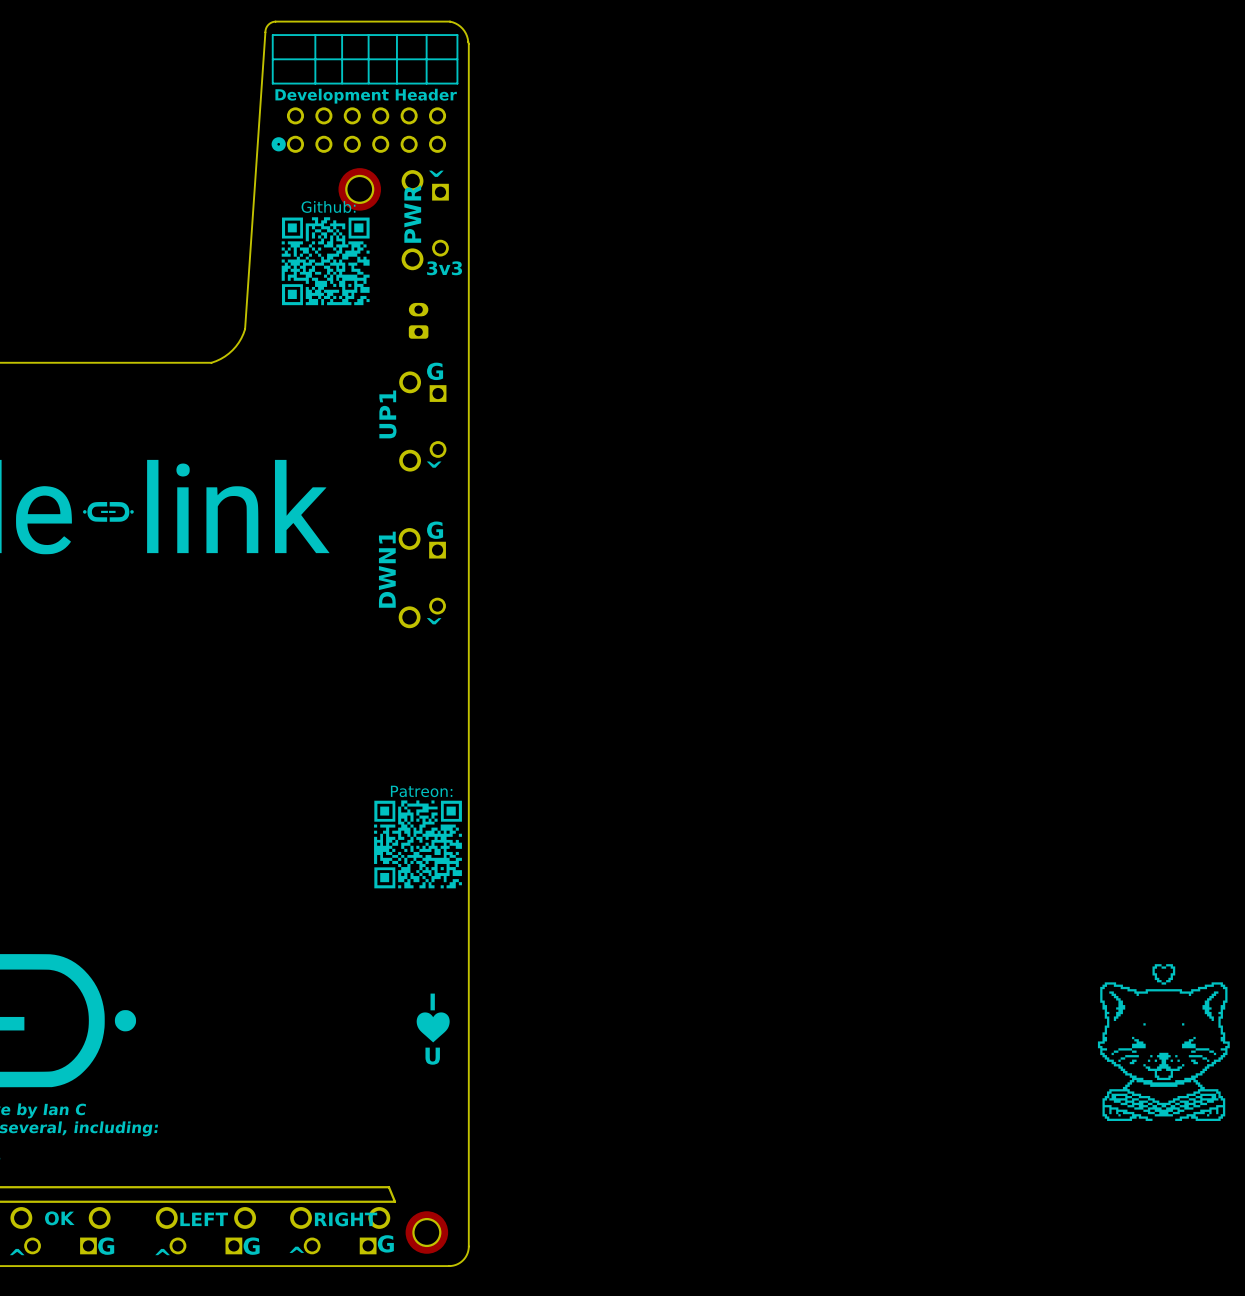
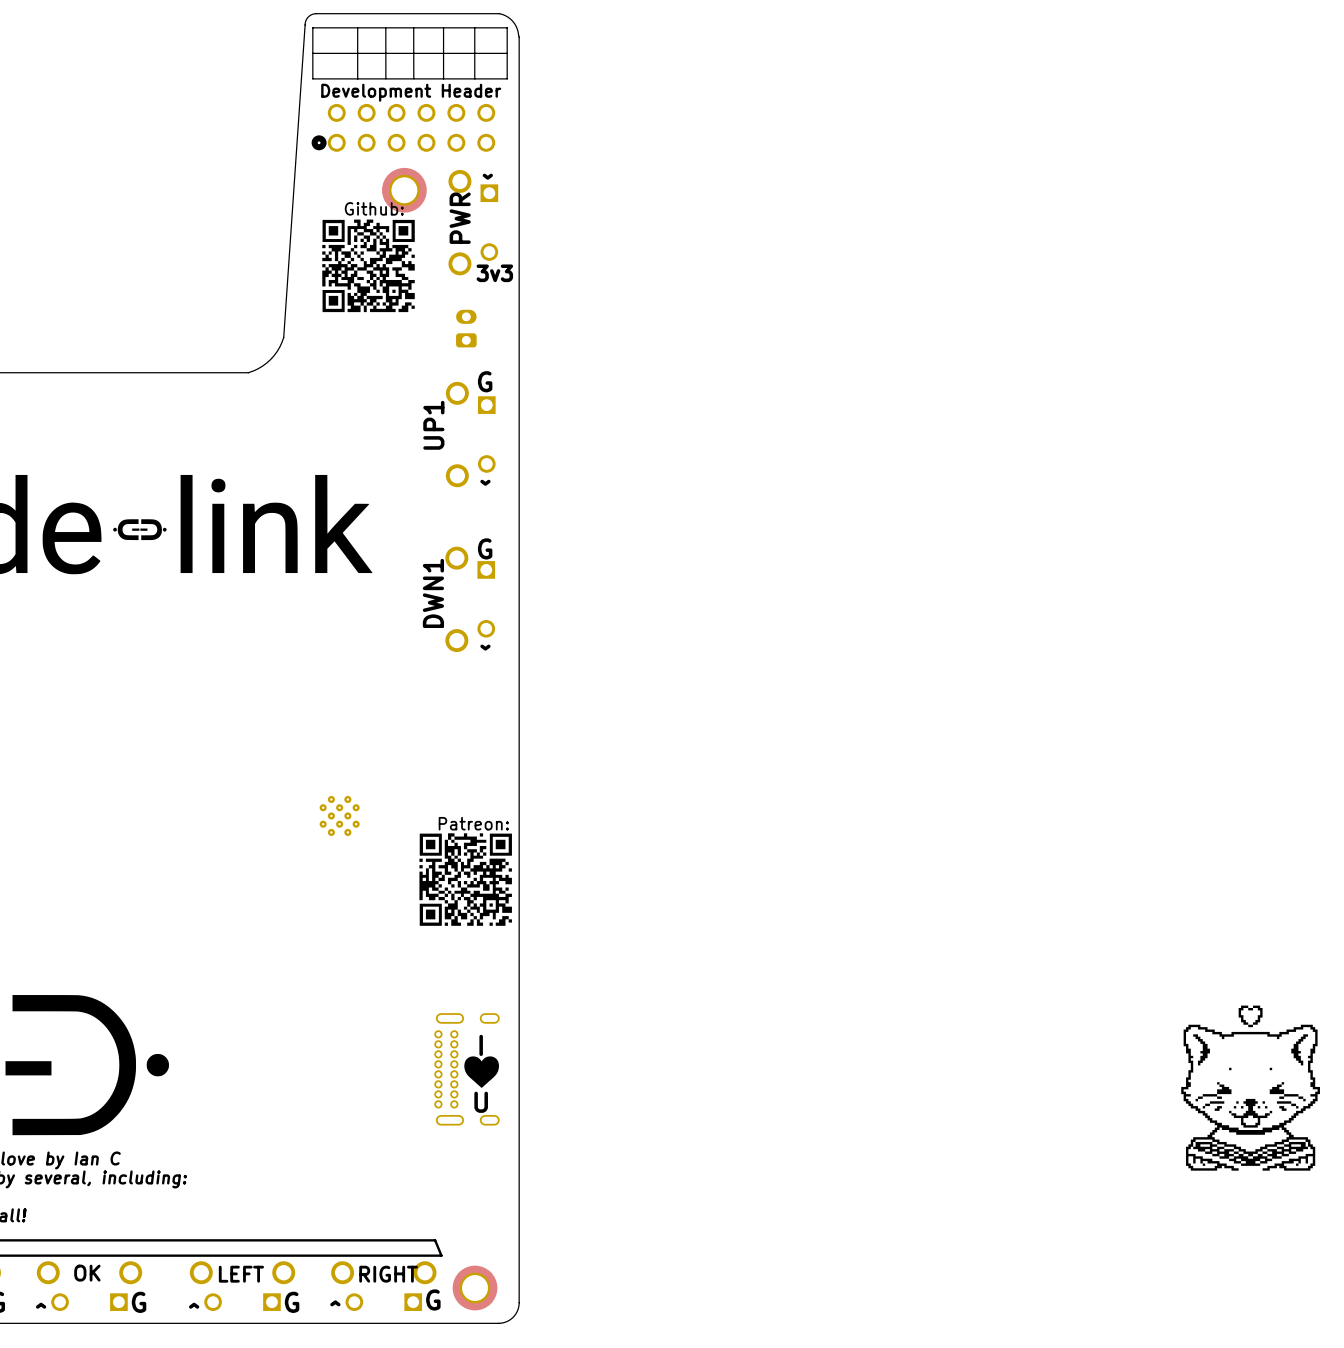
part: none -> (339, 815)
part: none -> (467, 1069)

